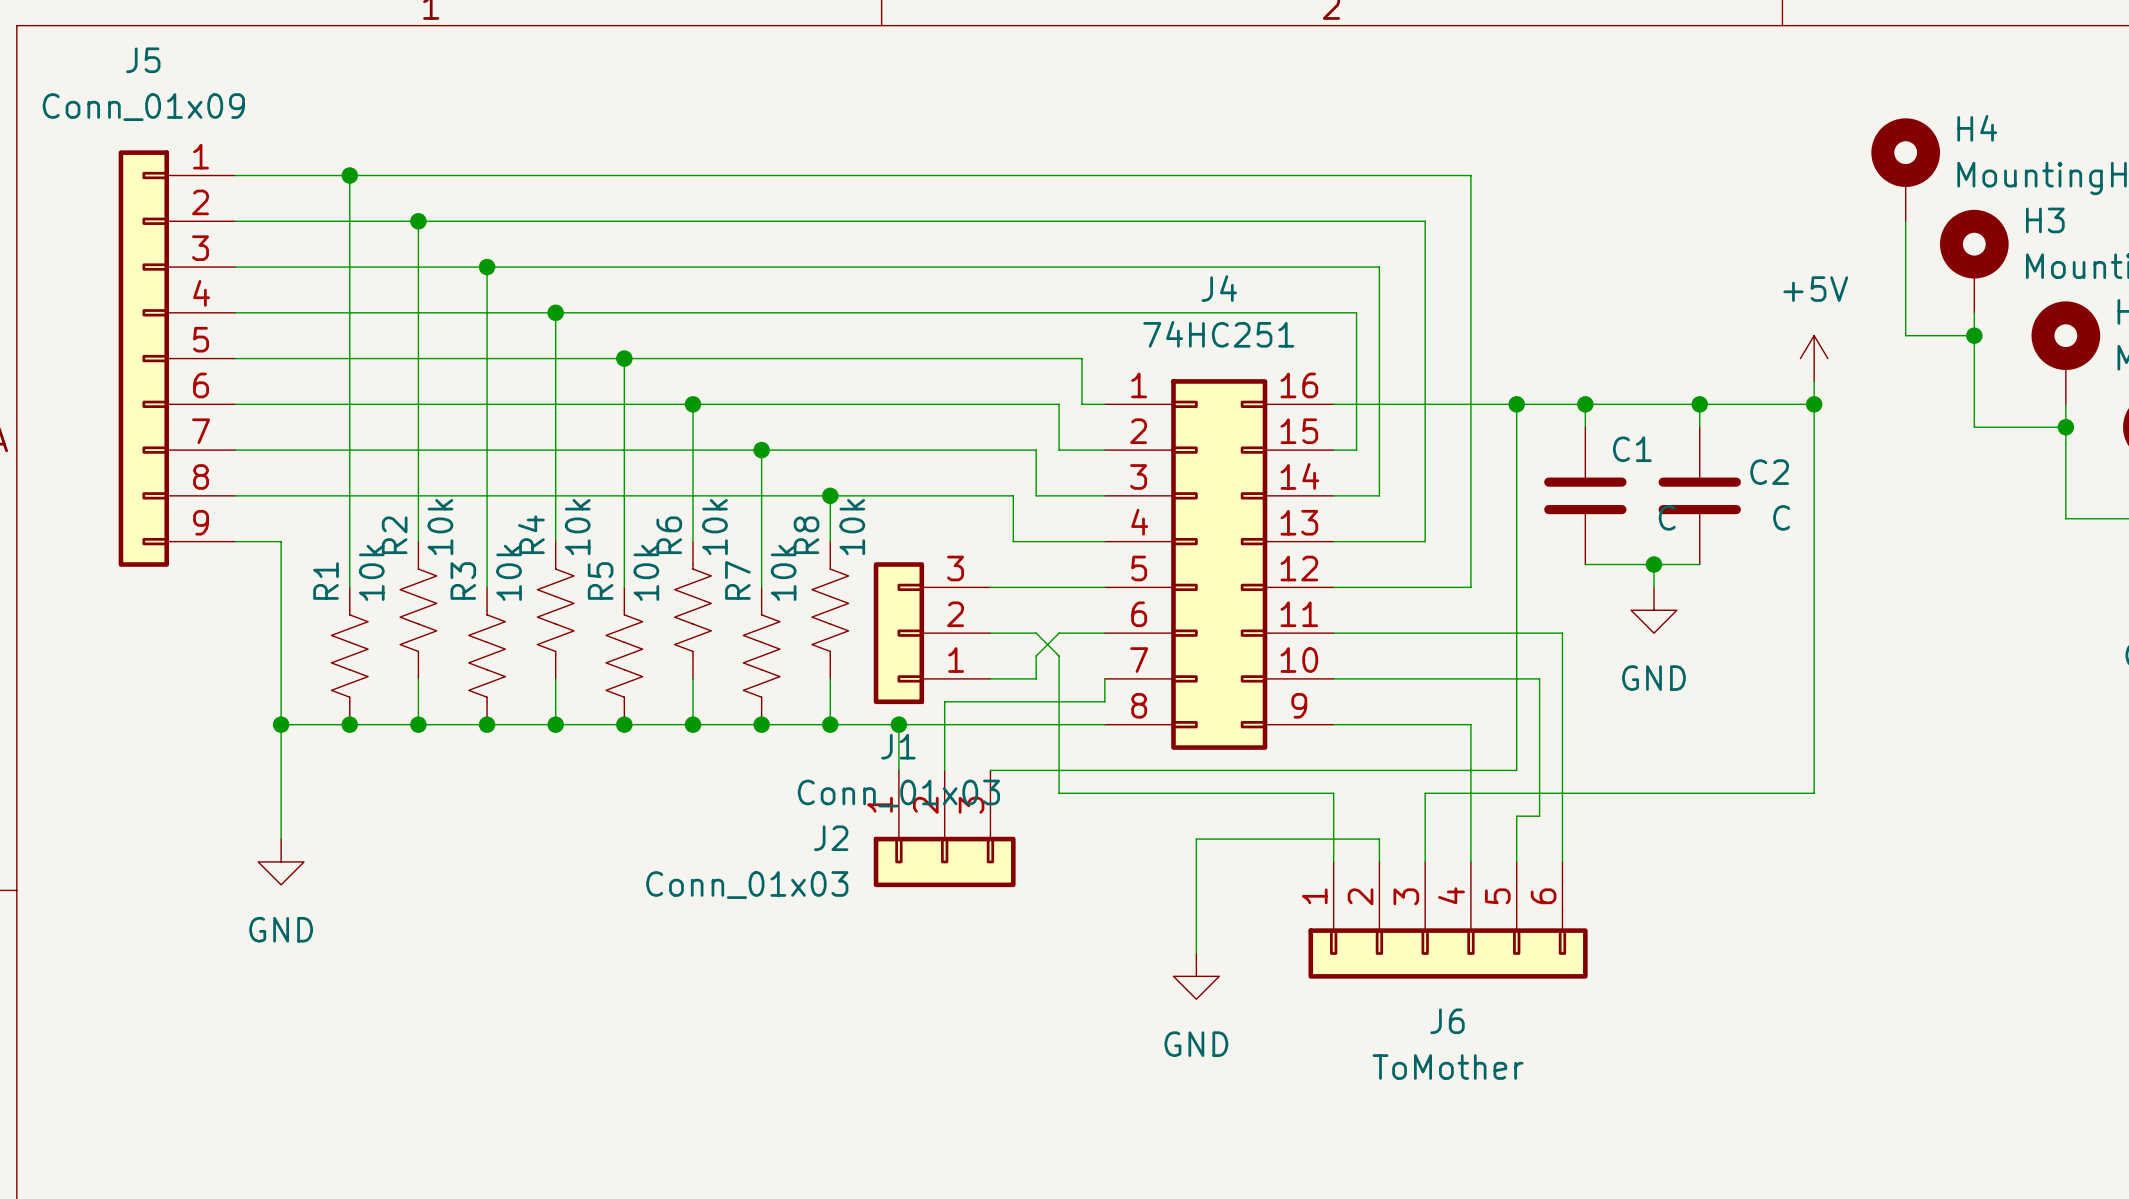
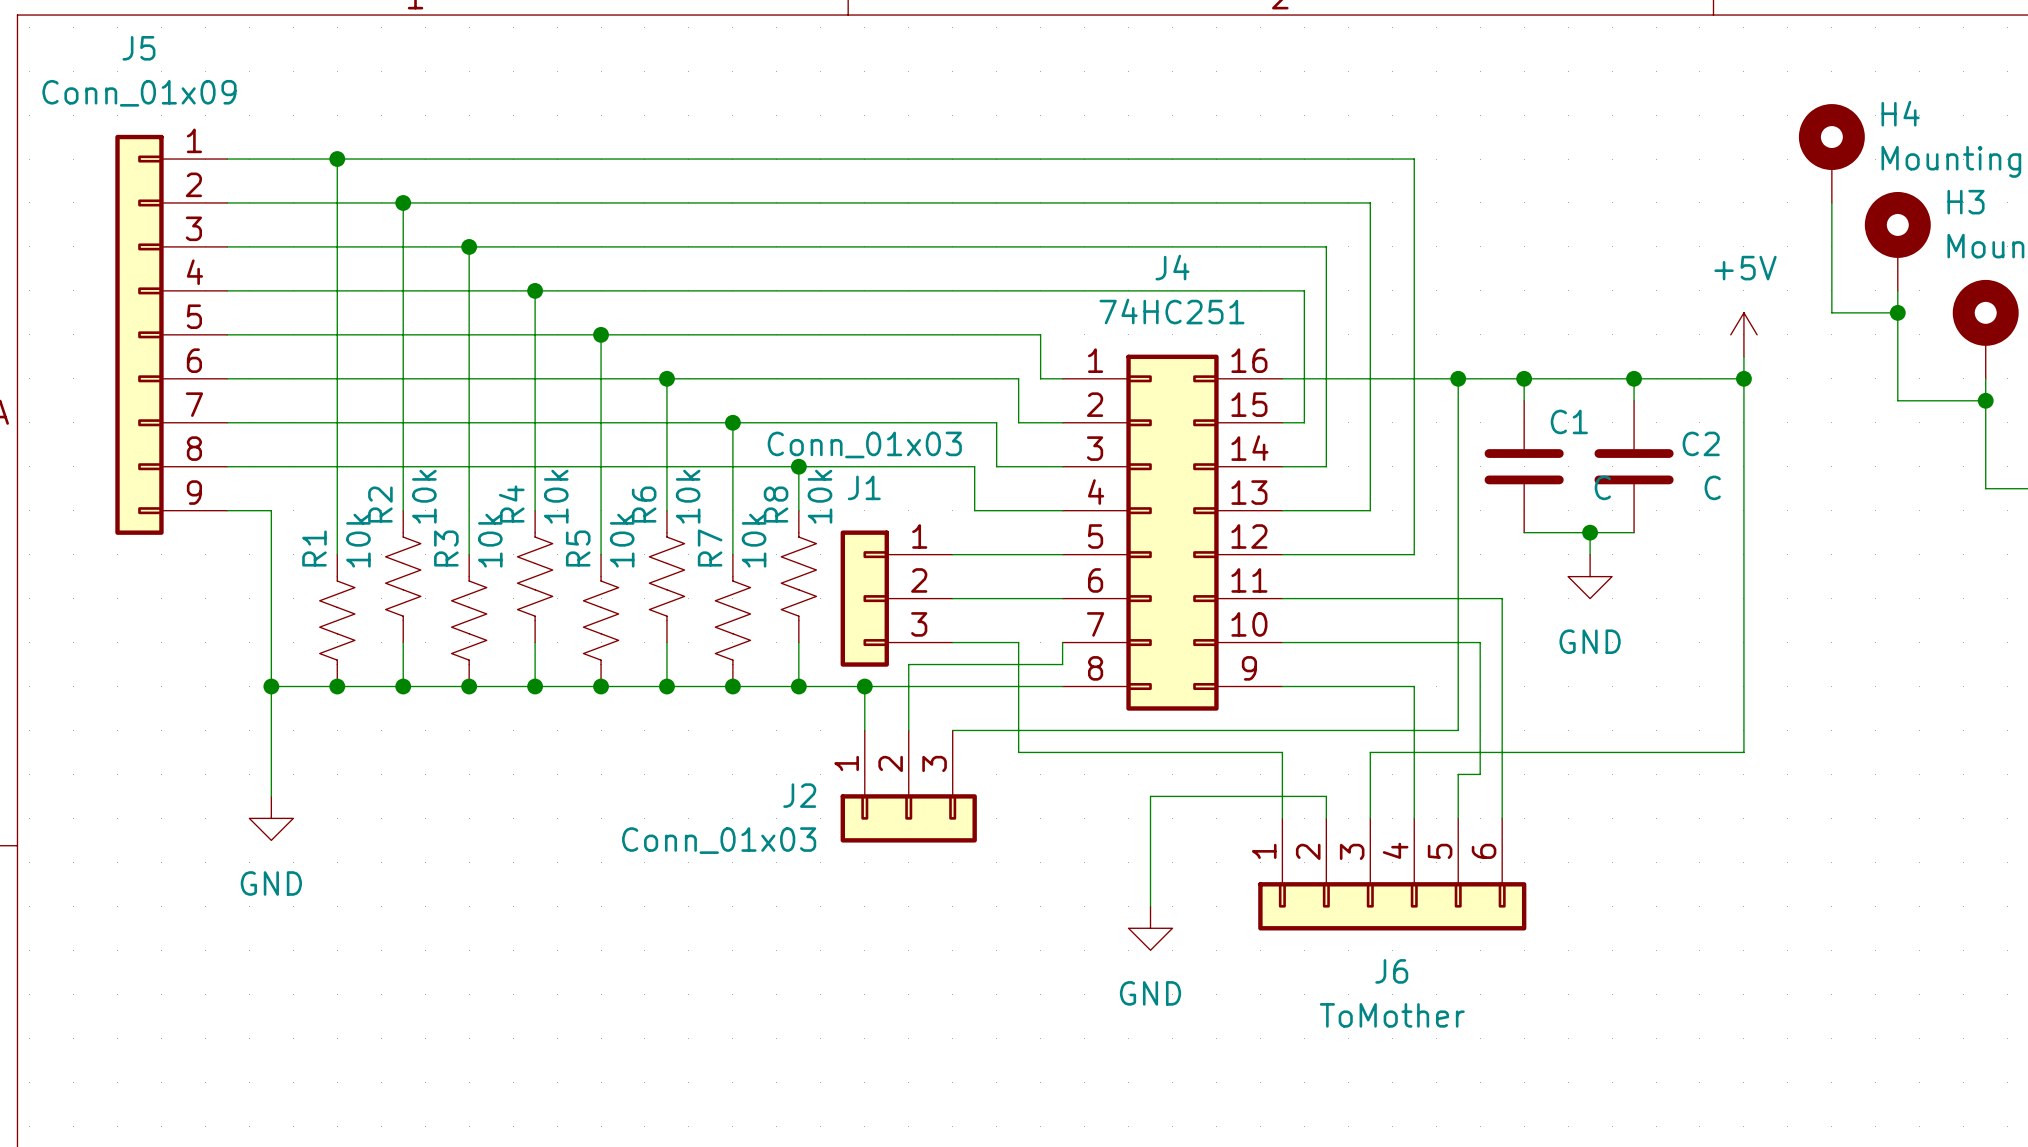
J1 flip: as is (898, 633) -> up-down (864, 598)
wire: (1036, 633) (1059, 656) (1059, 678) -> (996, 598) (1018, 598)
wire: (1059, 633) (1036, 656) (1036, 678) -> (1018, 642) (996, 642)

